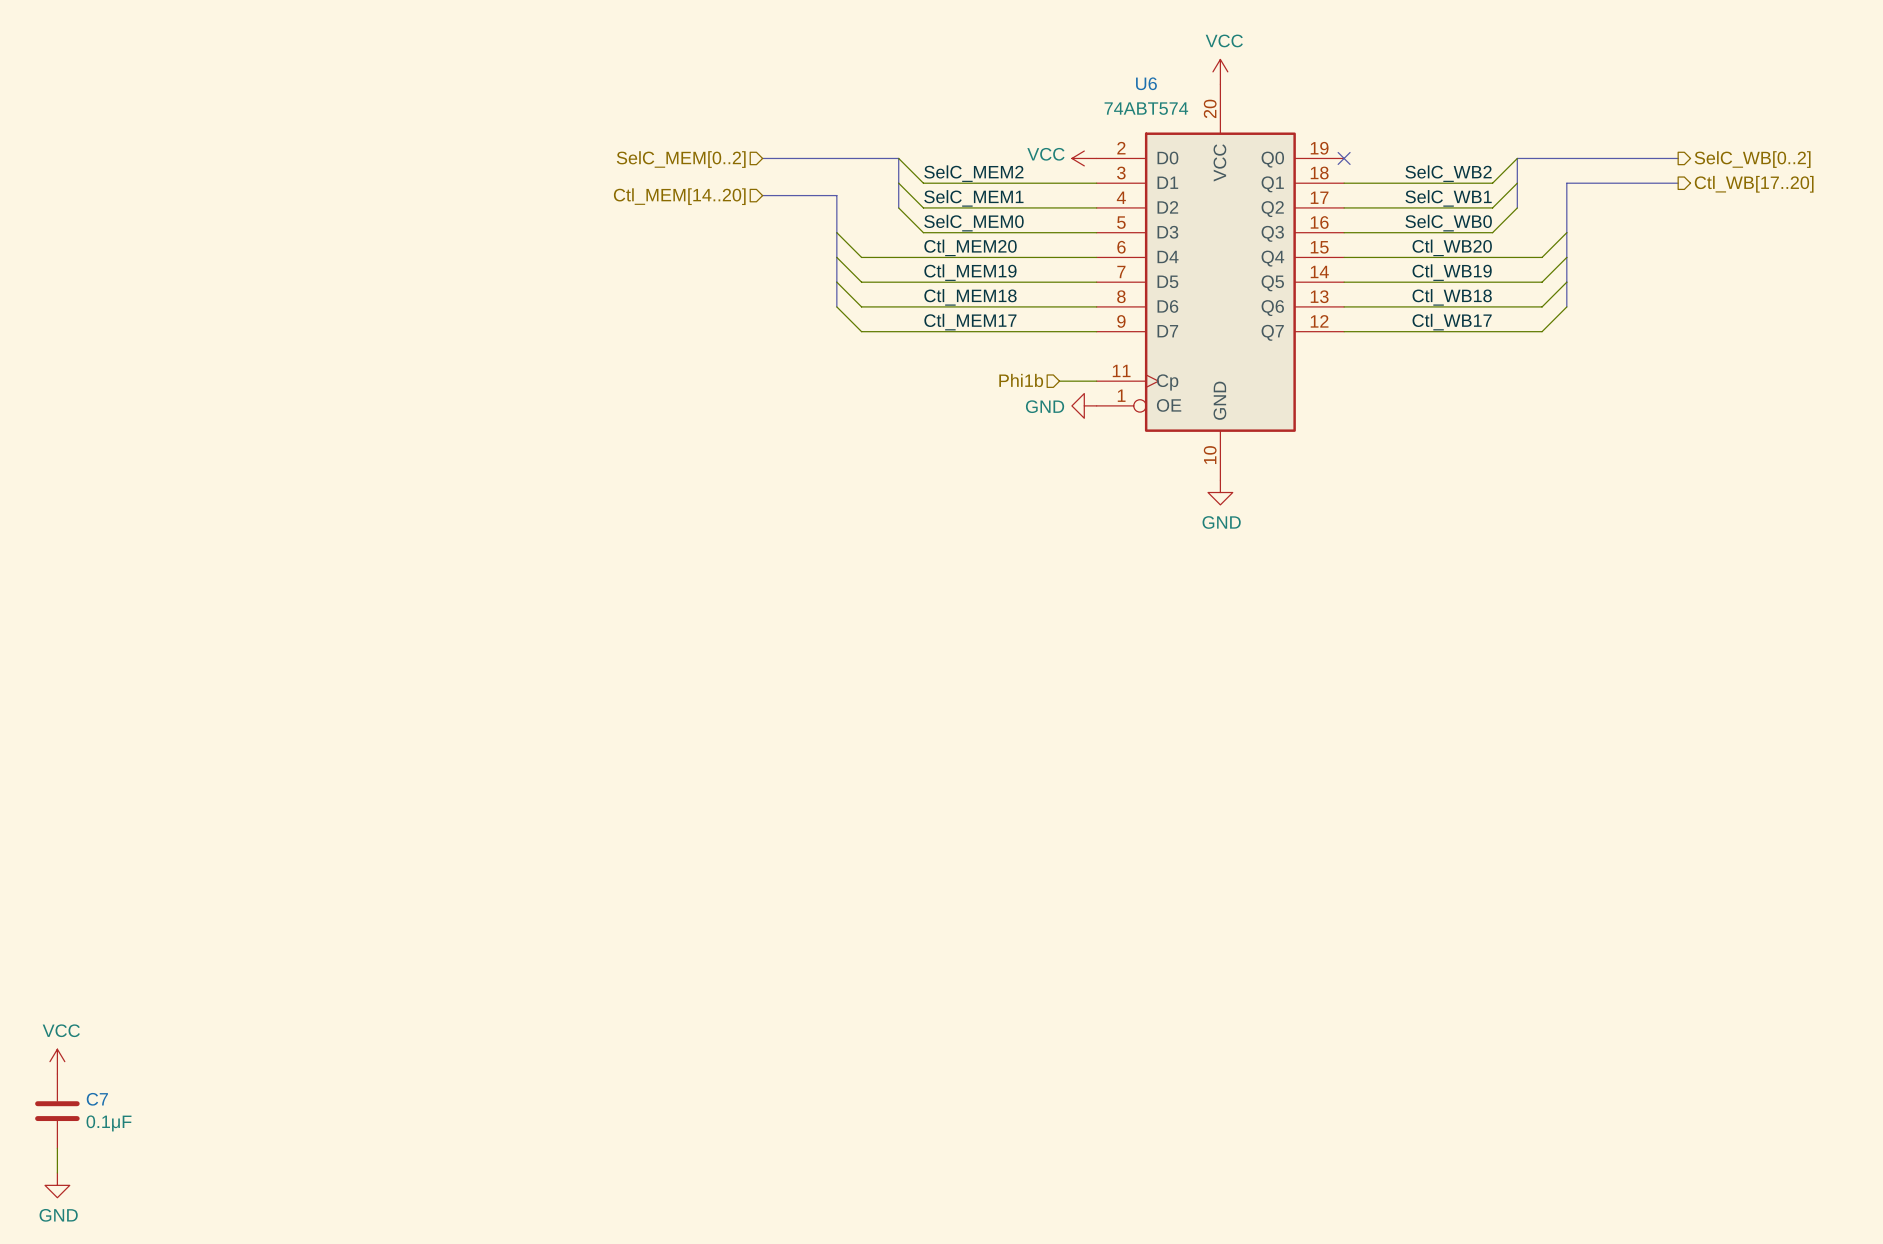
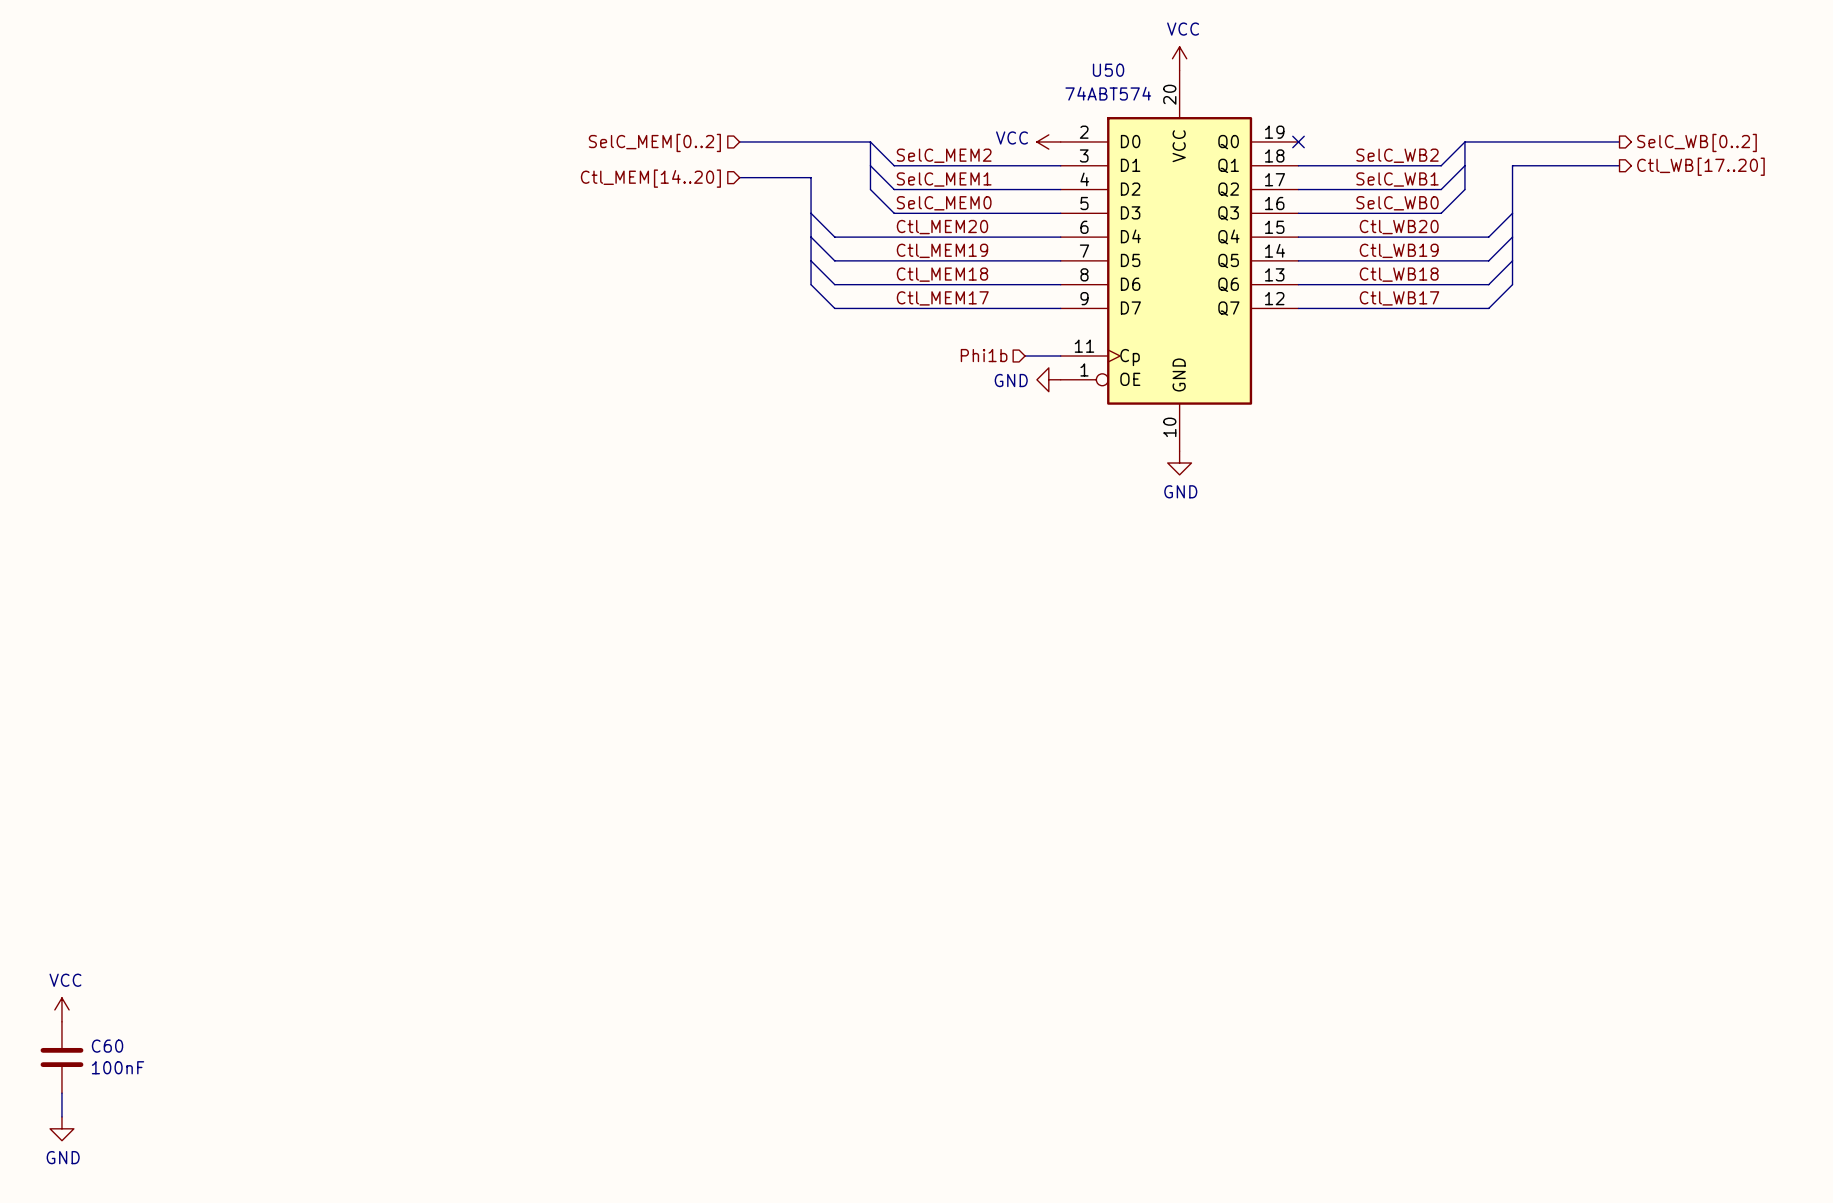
U6 name: U6 (1146, 83) -> U50 (1108, 70)
C7 name: C7 (97, 1099) -> C60 (107, 1046)
C7 value: 0.1μF (109, 1123) -> 100nF (118, 1067)

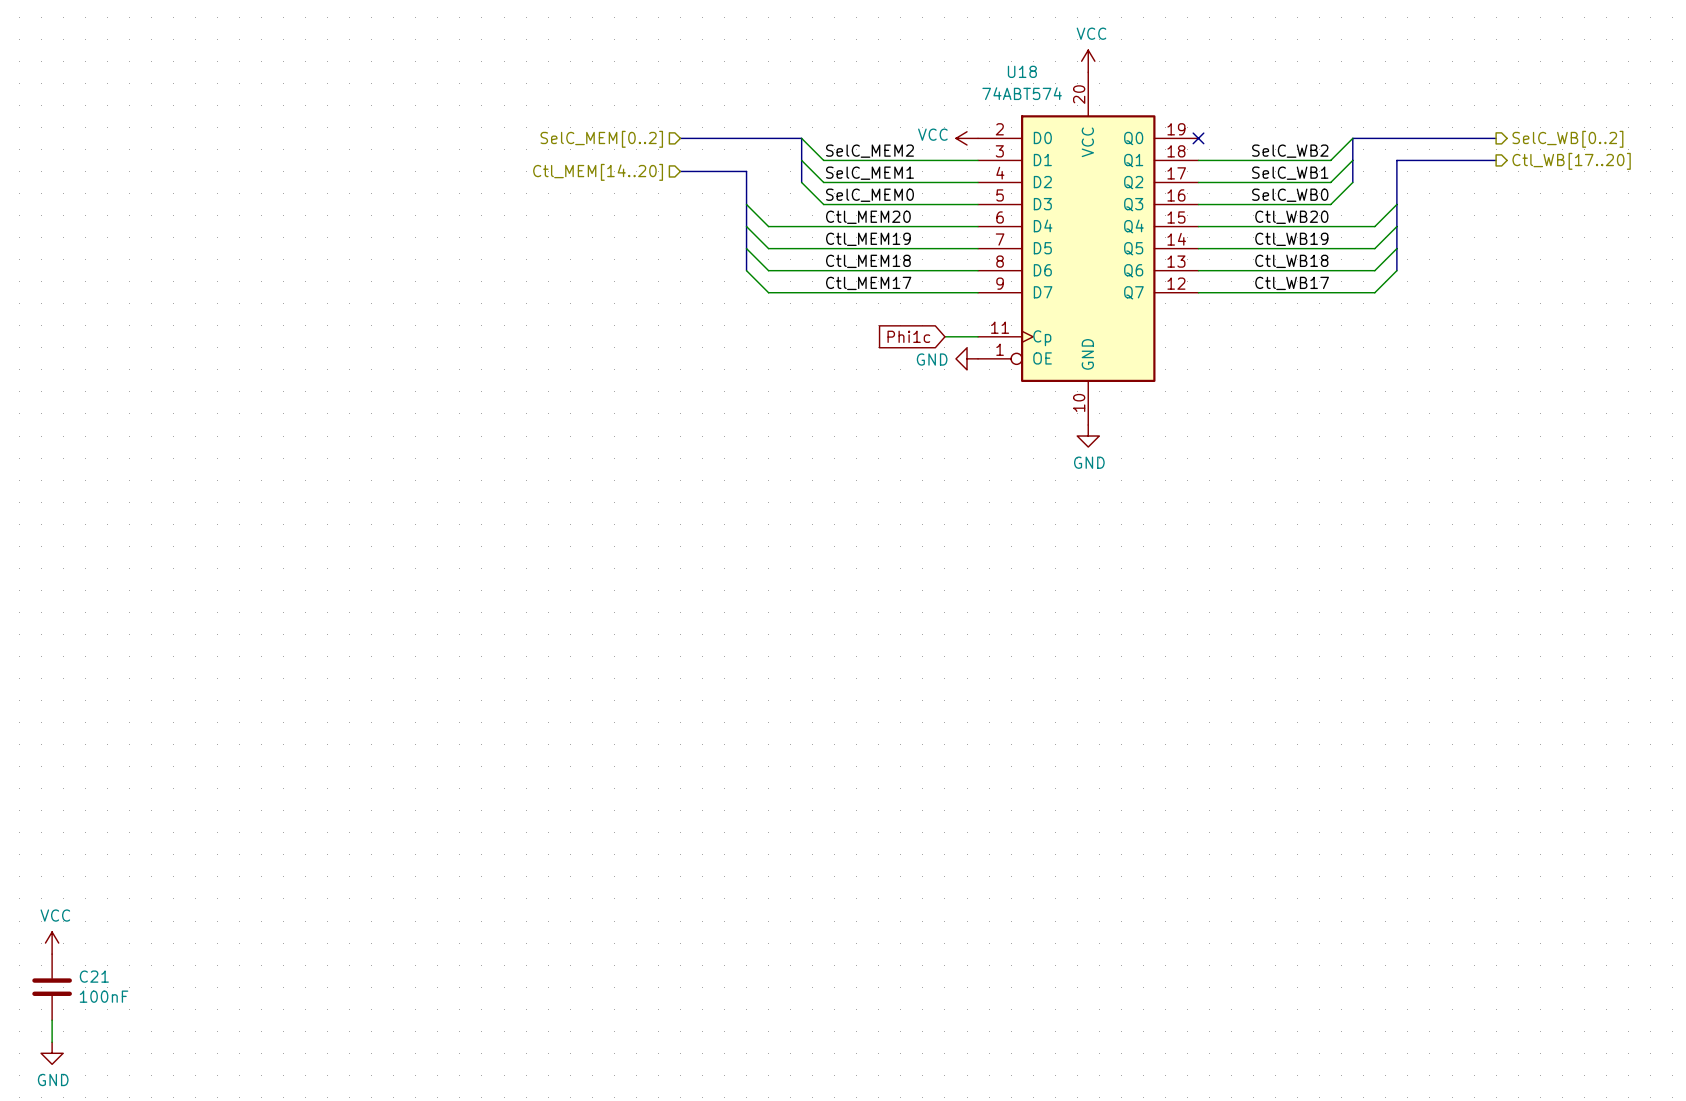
U50 name: U50 (1108, 70) -> U18 (1022, 71)
hierarchical label: Phi1b (984, 355) -> none
global label: none -> Phi1c (908, 336)
C60 name: C60 (107, 1046) -> C21 (94, 976)

